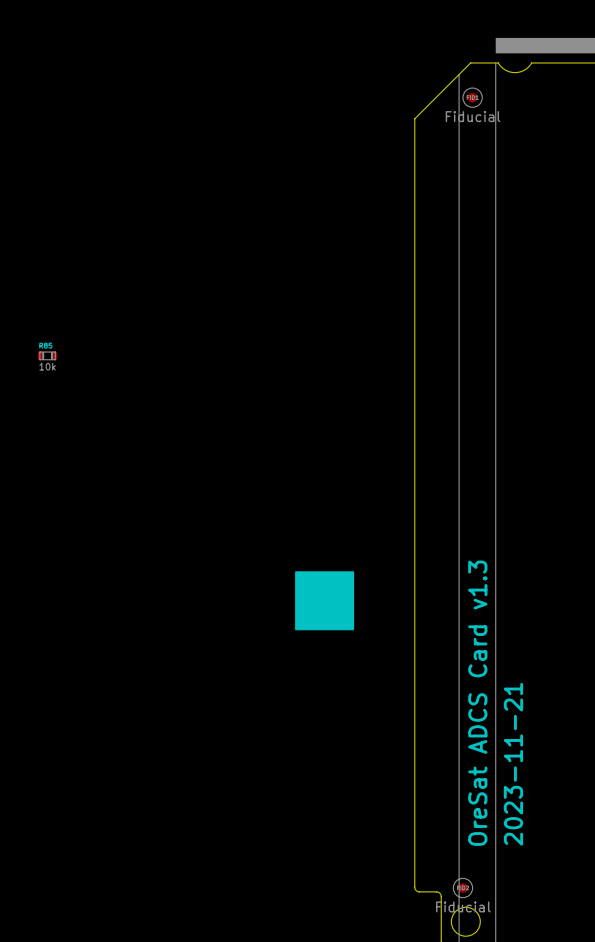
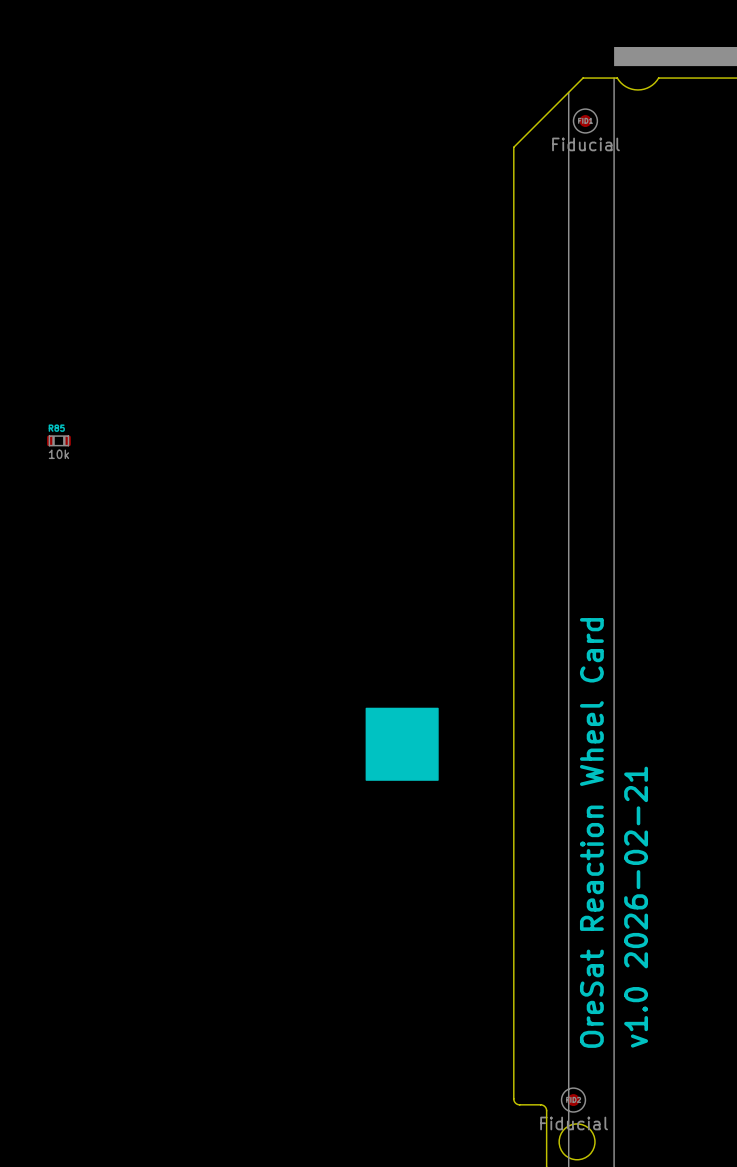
text: OreSat ADCS Card v1.3 (477, 703) -> OreSat Reaction Wheel Card (591, 832)
text: 2023-11-21 (513, 764) -> v1.0 2026-02-21 (636, 907)

